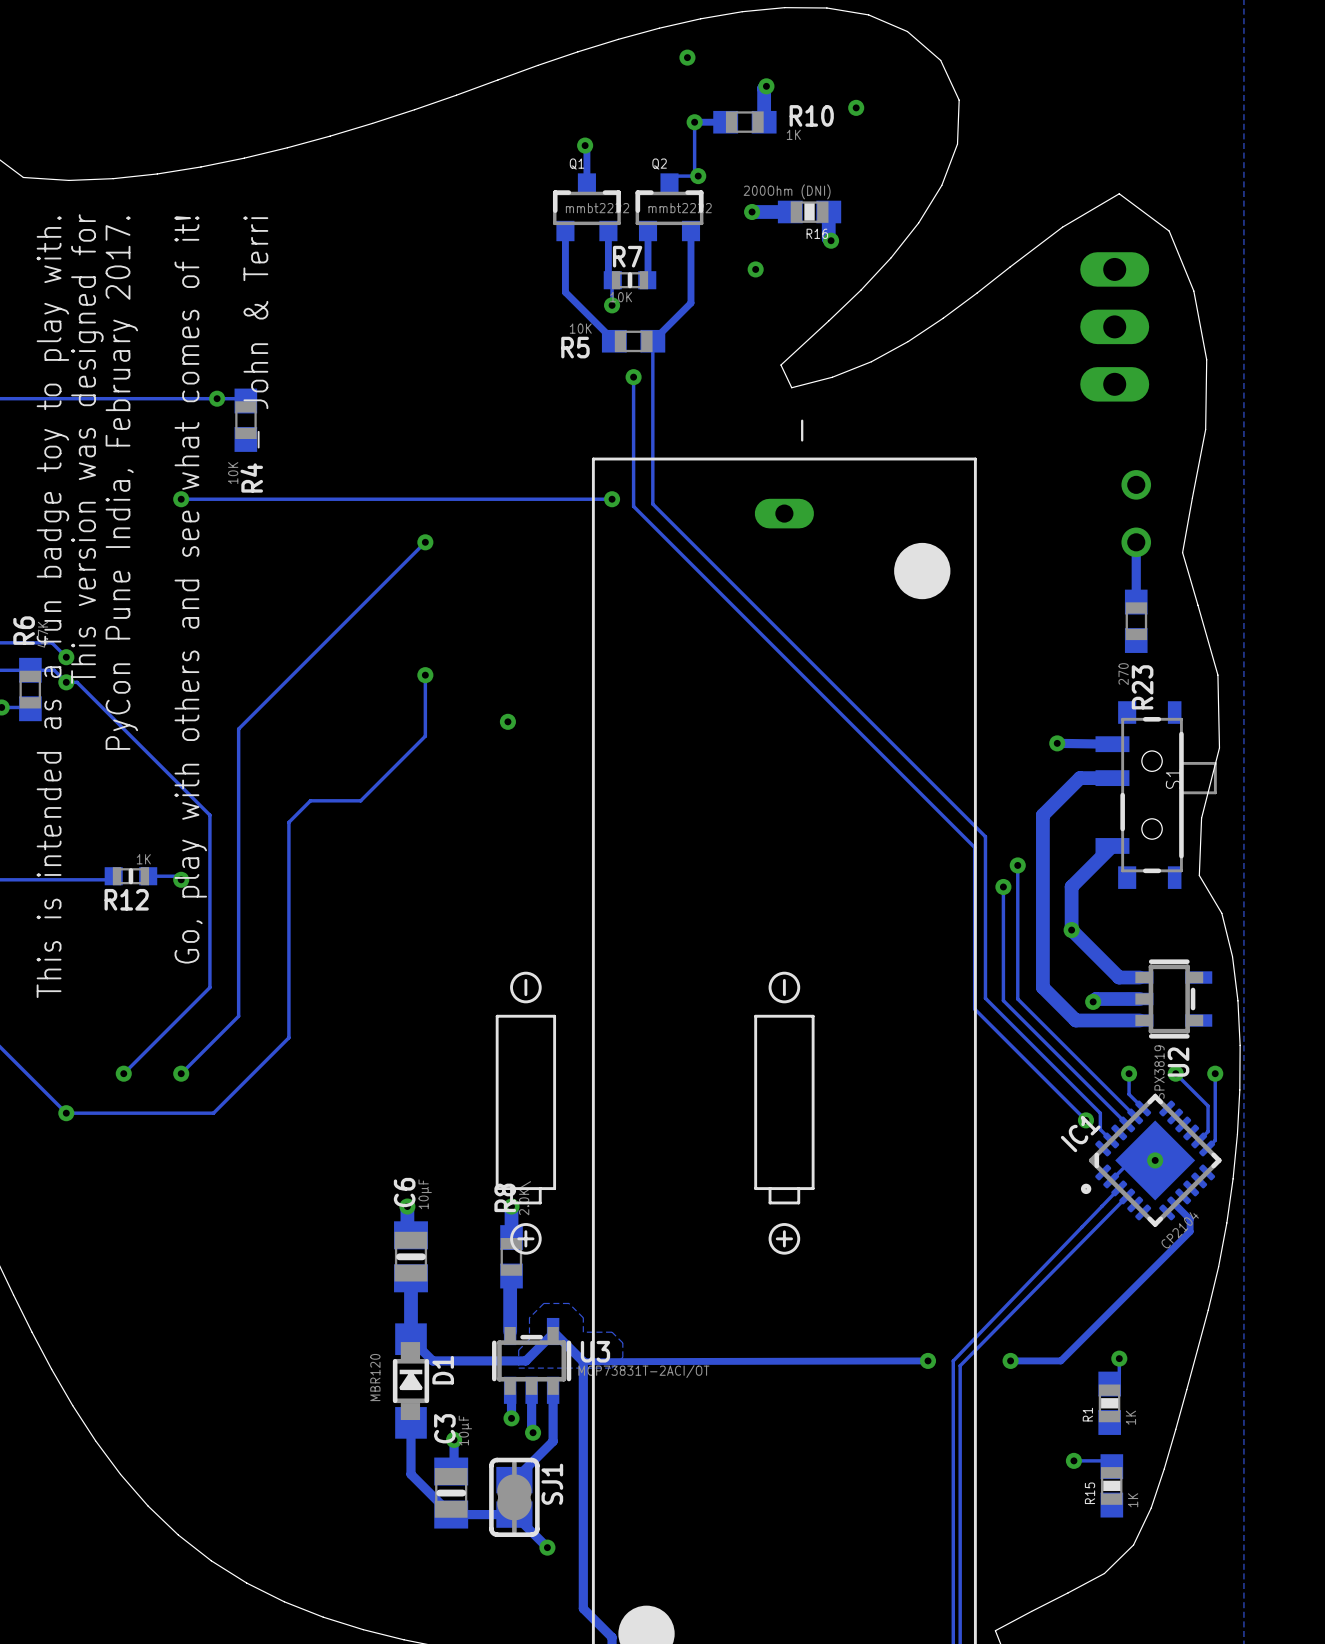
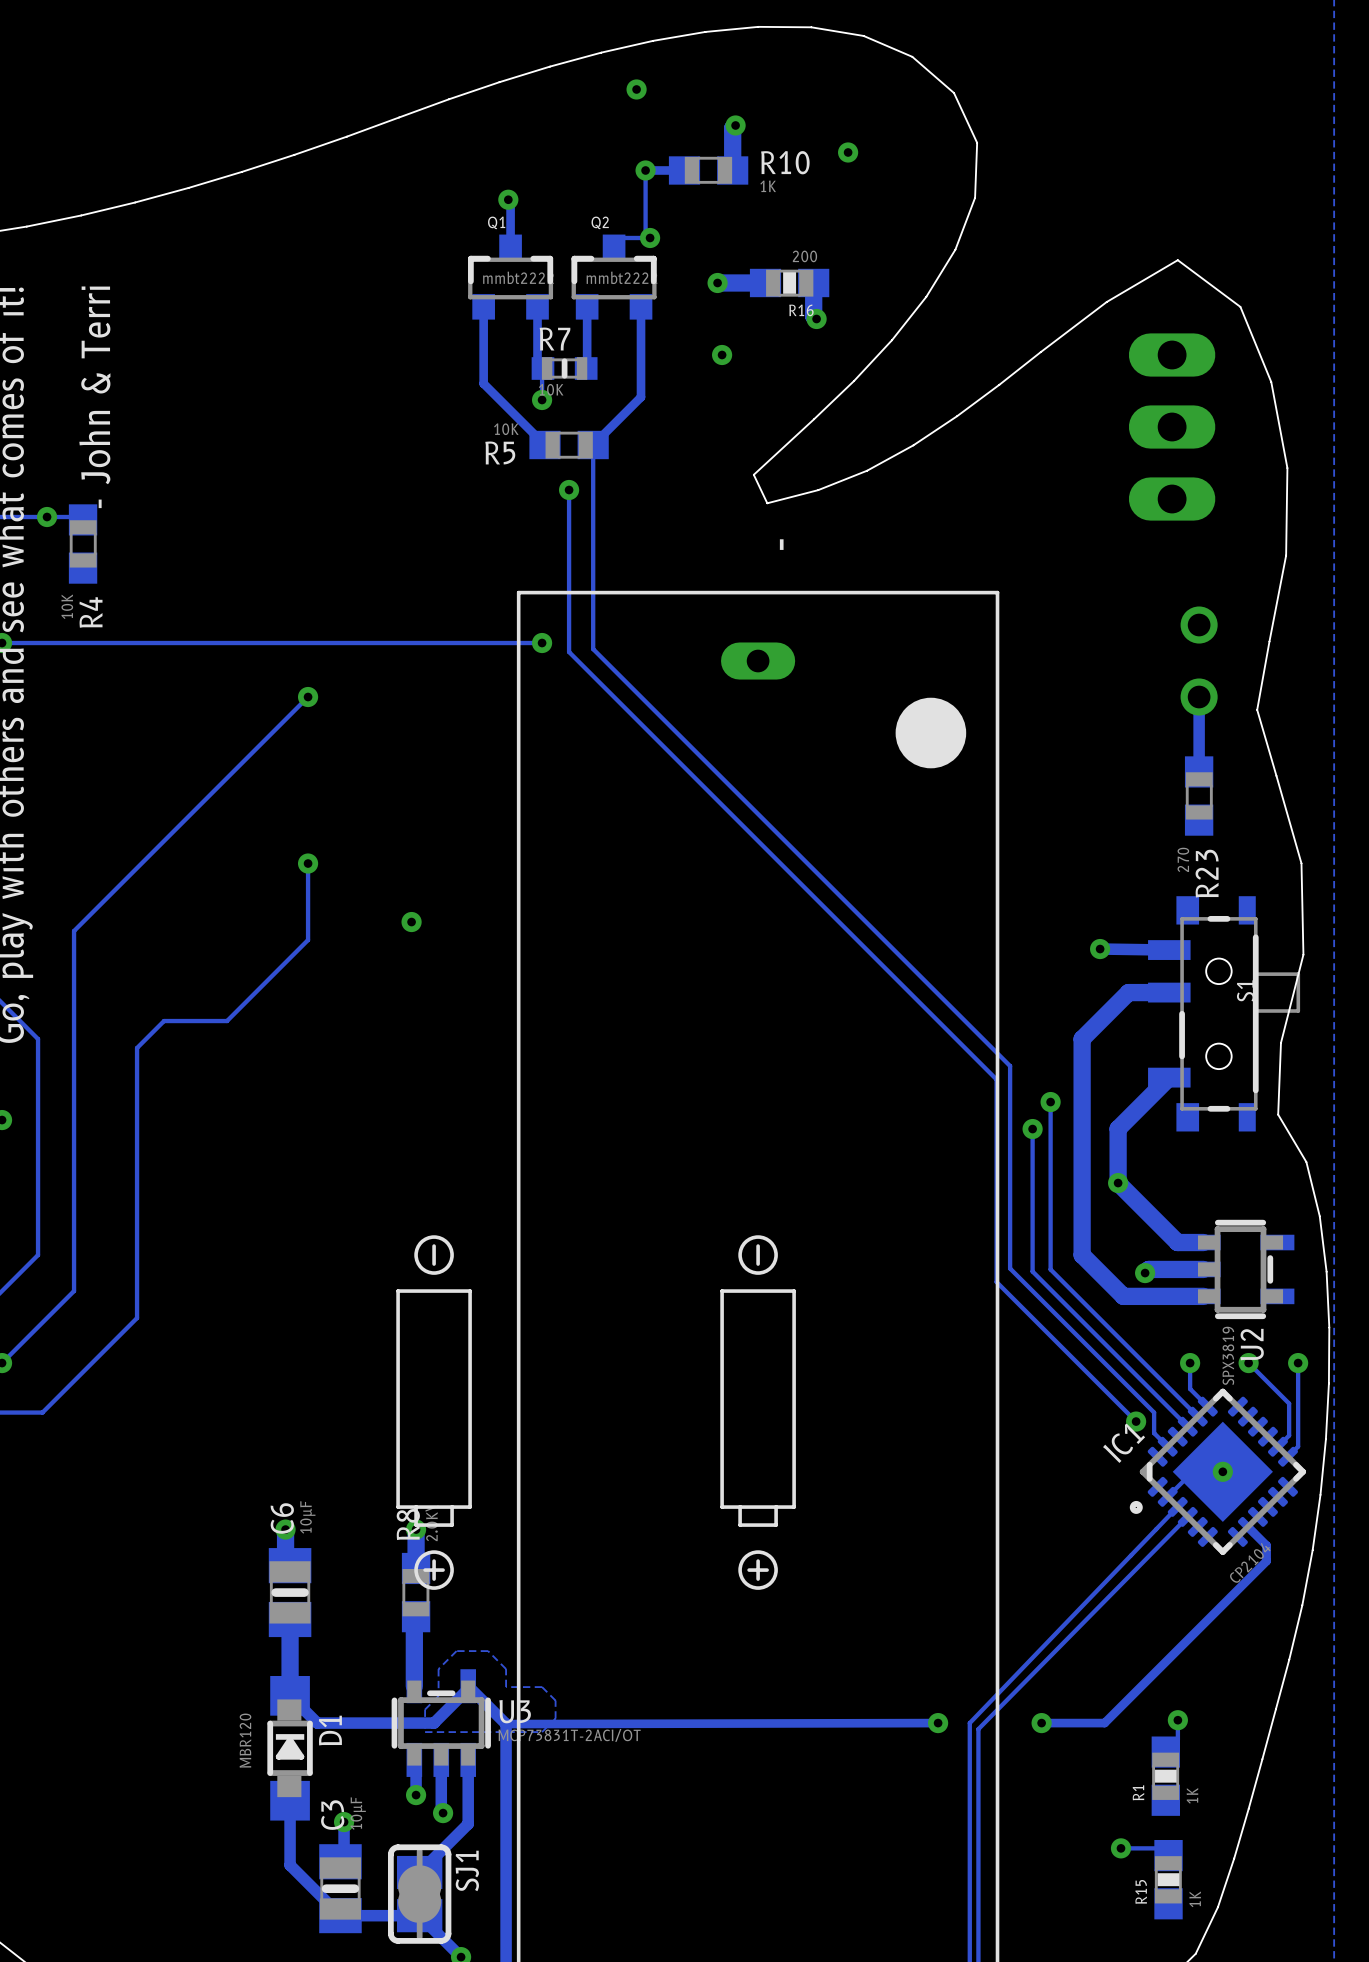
R16 value: 200Ohm (DNI) (787, 191) -> 200 (804, 256)

